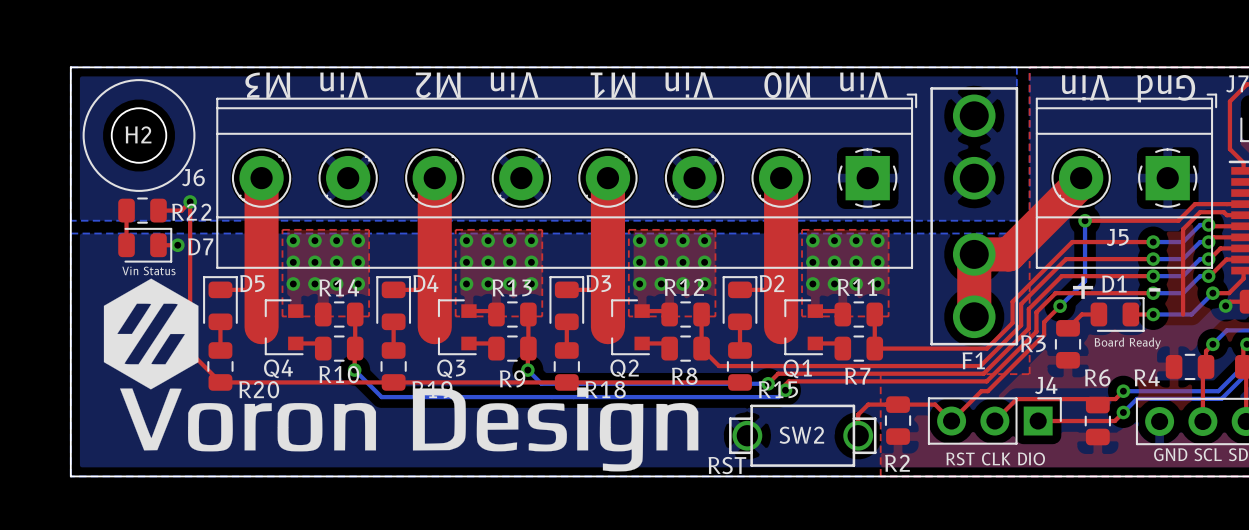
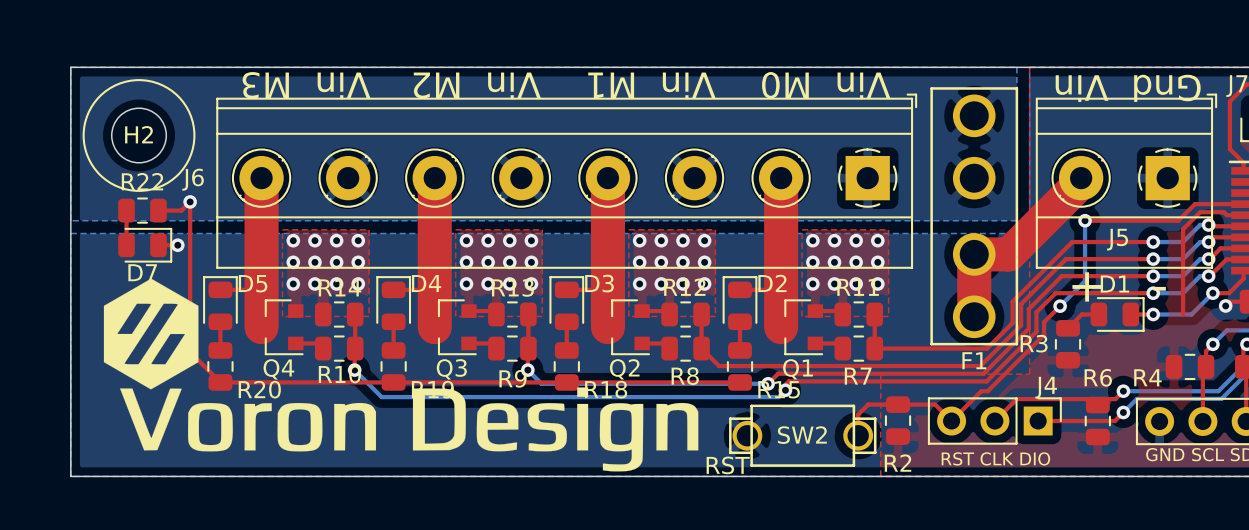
R22 name position: R22 (191, 212) -> R22 (142, 181)
D7 name position: D7 (200, 246) -> D7 (142, 272)
text: Vin Status (148, 270) -> none
text: Board Ready (1127, 343) -> none

